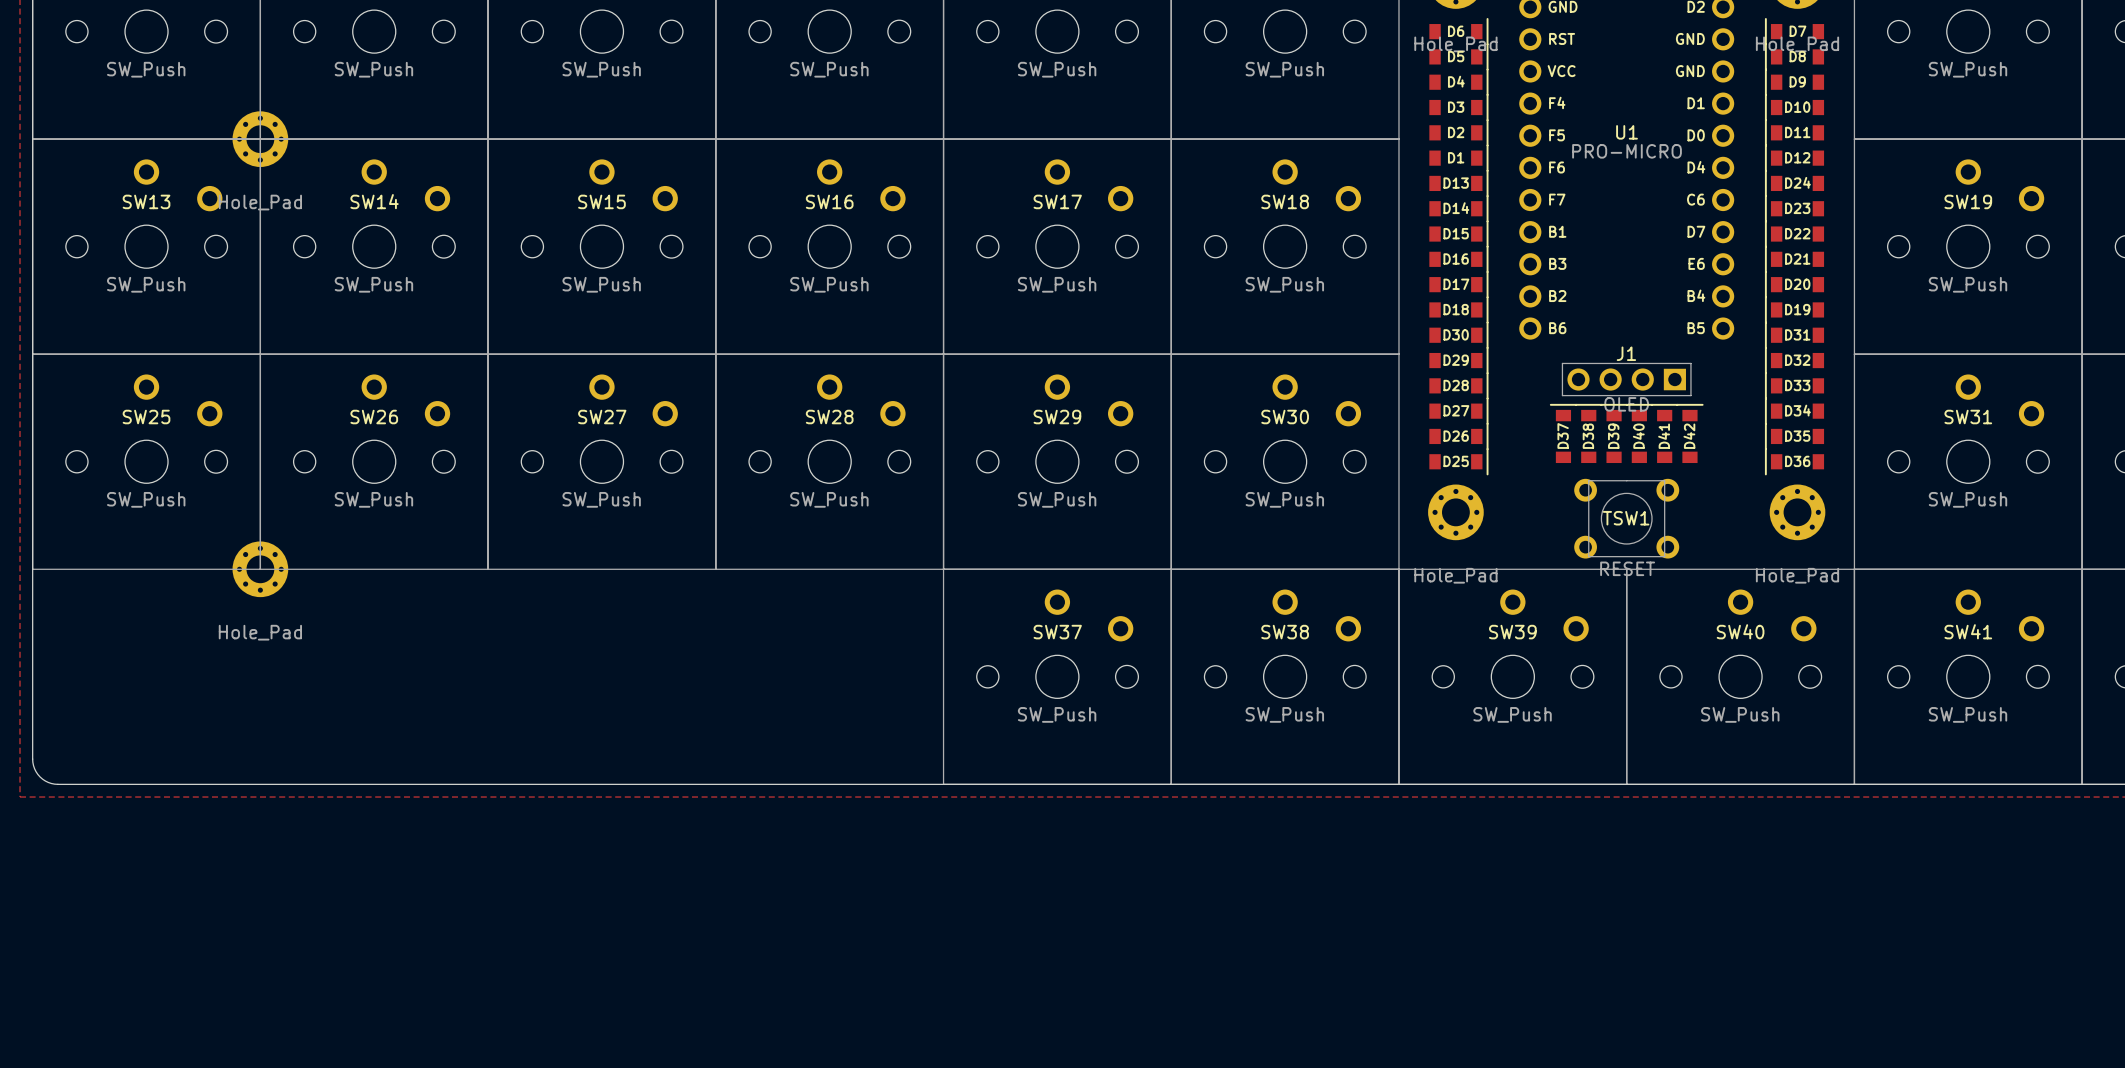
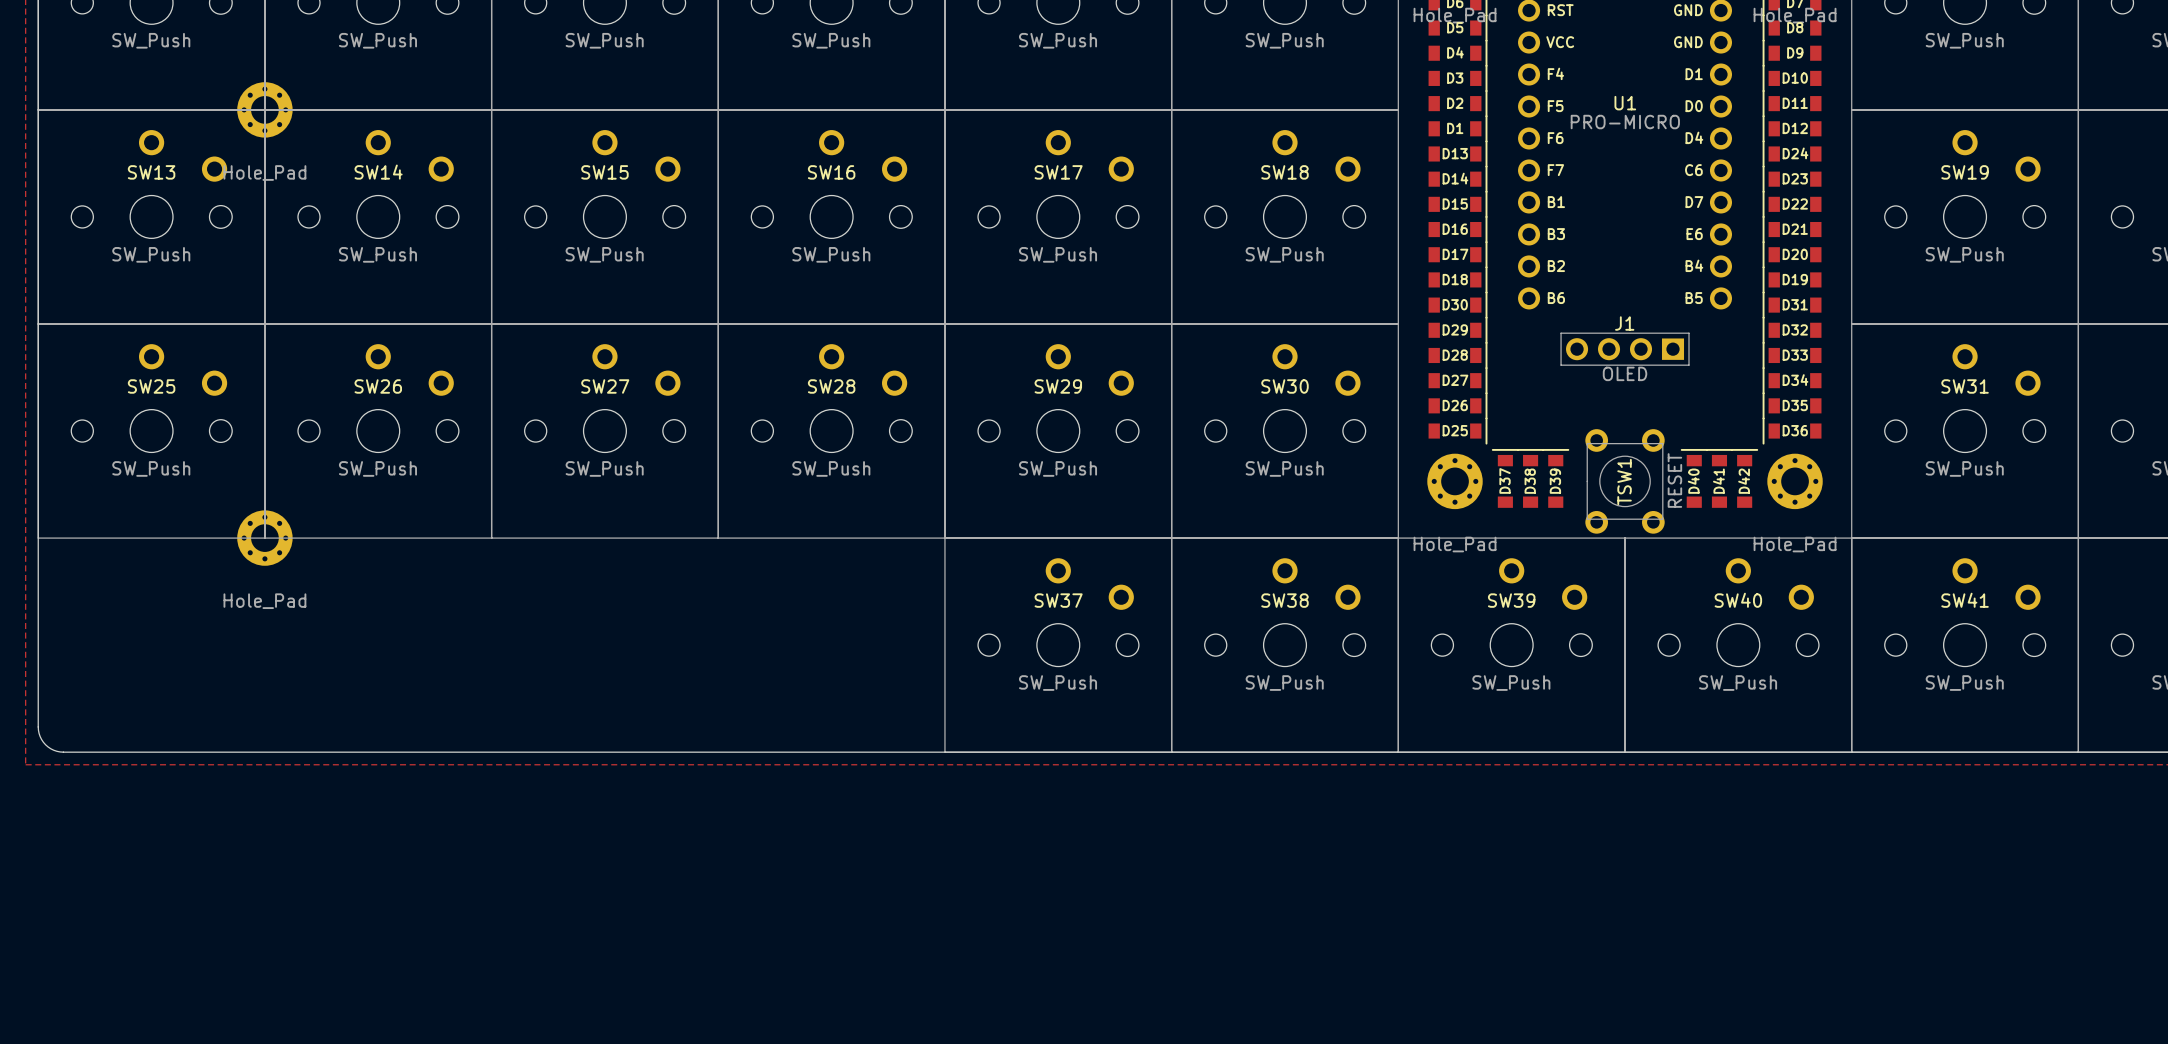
D37 position: (1563, 433) -> (1505, 478)
D38 position: (1588, 433) -> (1530, 478)
D39 position: (1614, 433) -> (1555, 478)
D40 position: (1639, 433) -> (1694, 478)
D41 position: (1664, 433) -> (1719, 478)
D42 position: (1689, 433) -> (1744, 478)
TSW1 rotation: 0° (1626, 518) -> 90° counterclockwise (1625, 481)

